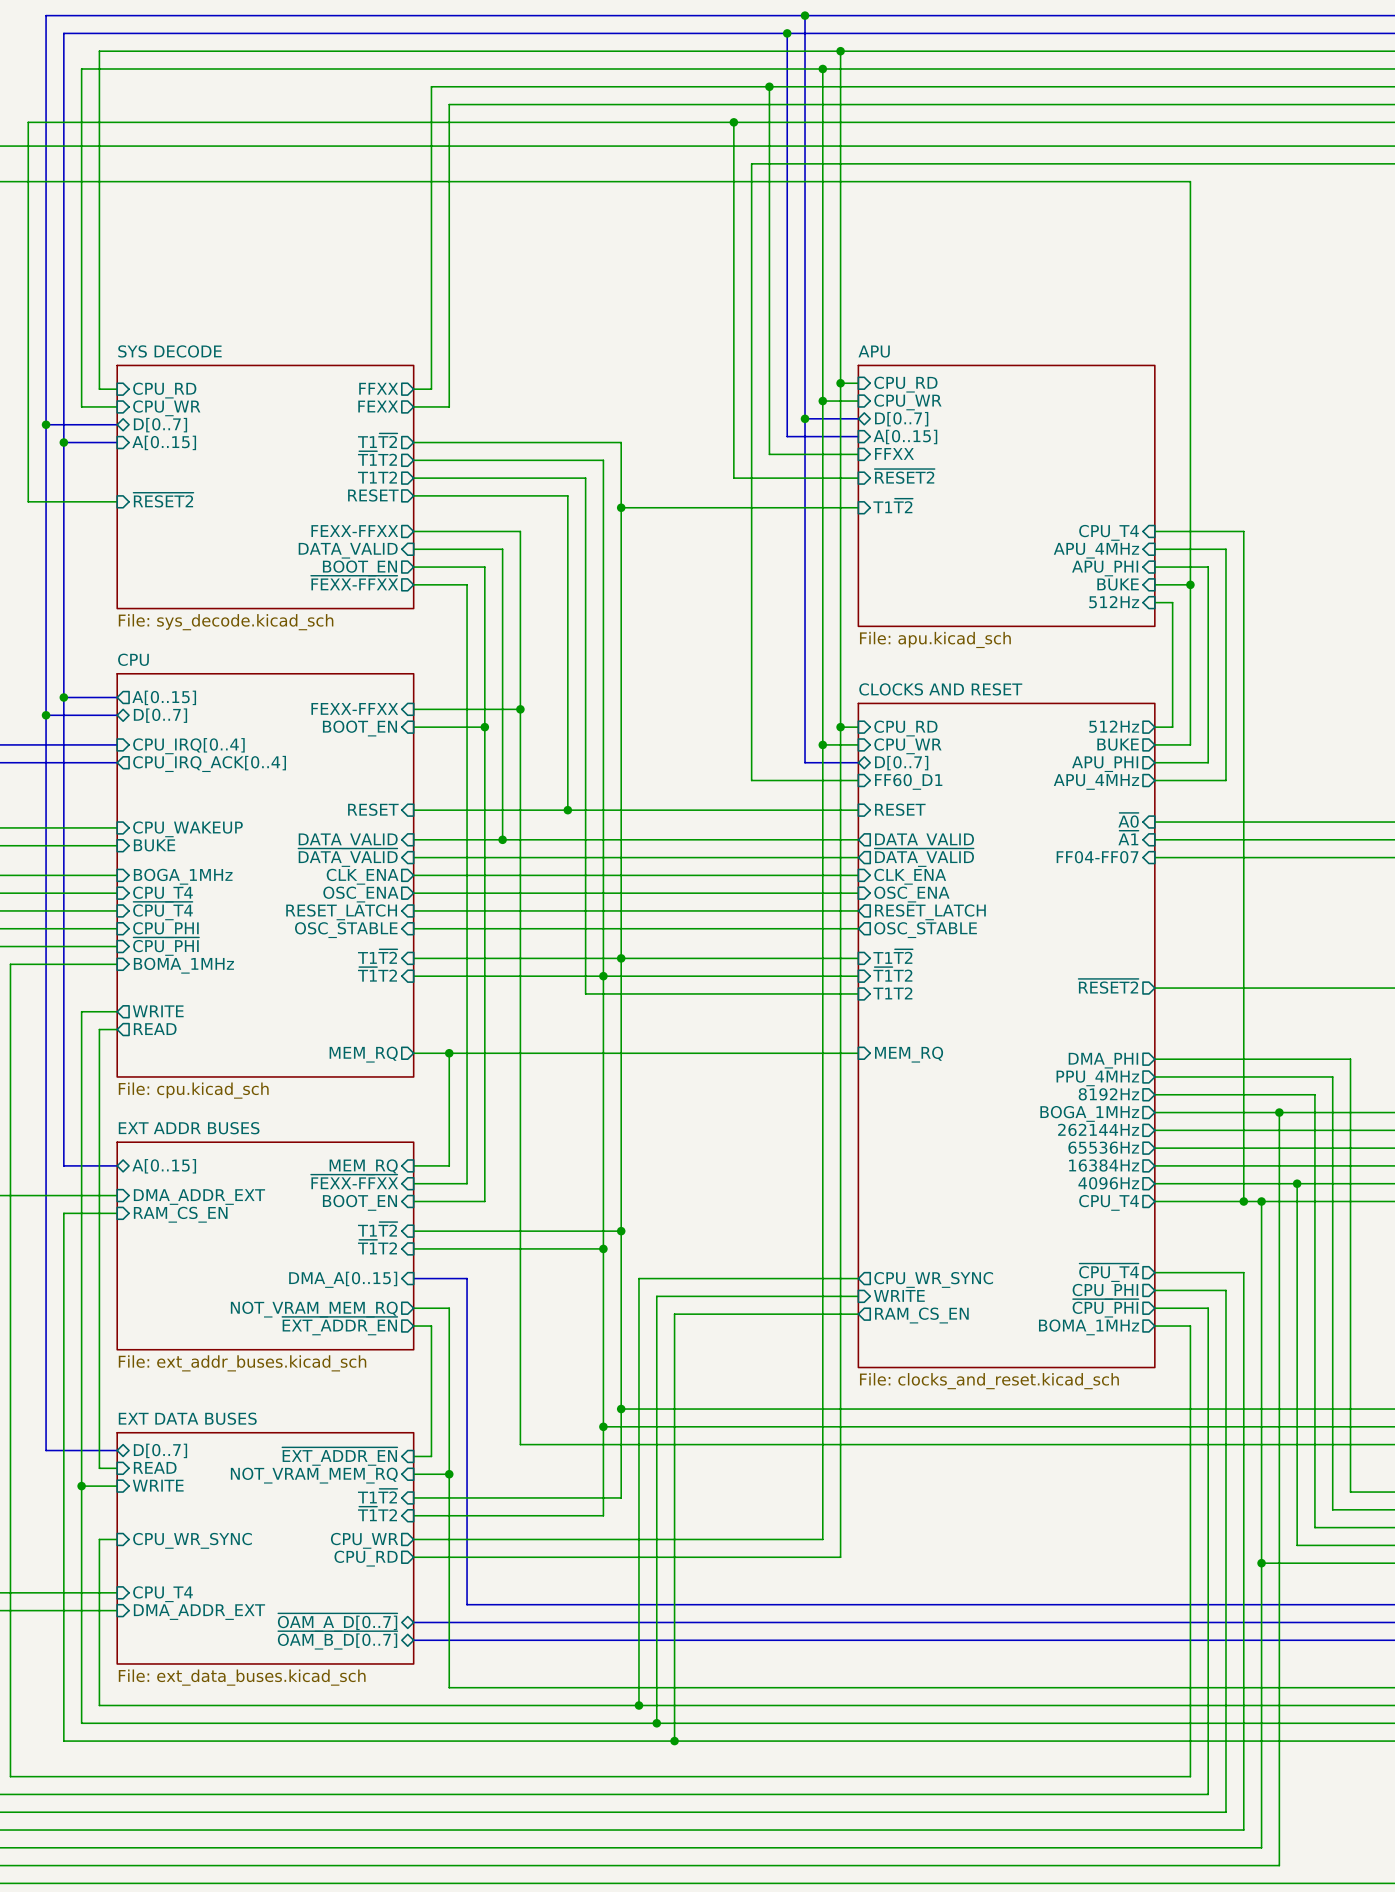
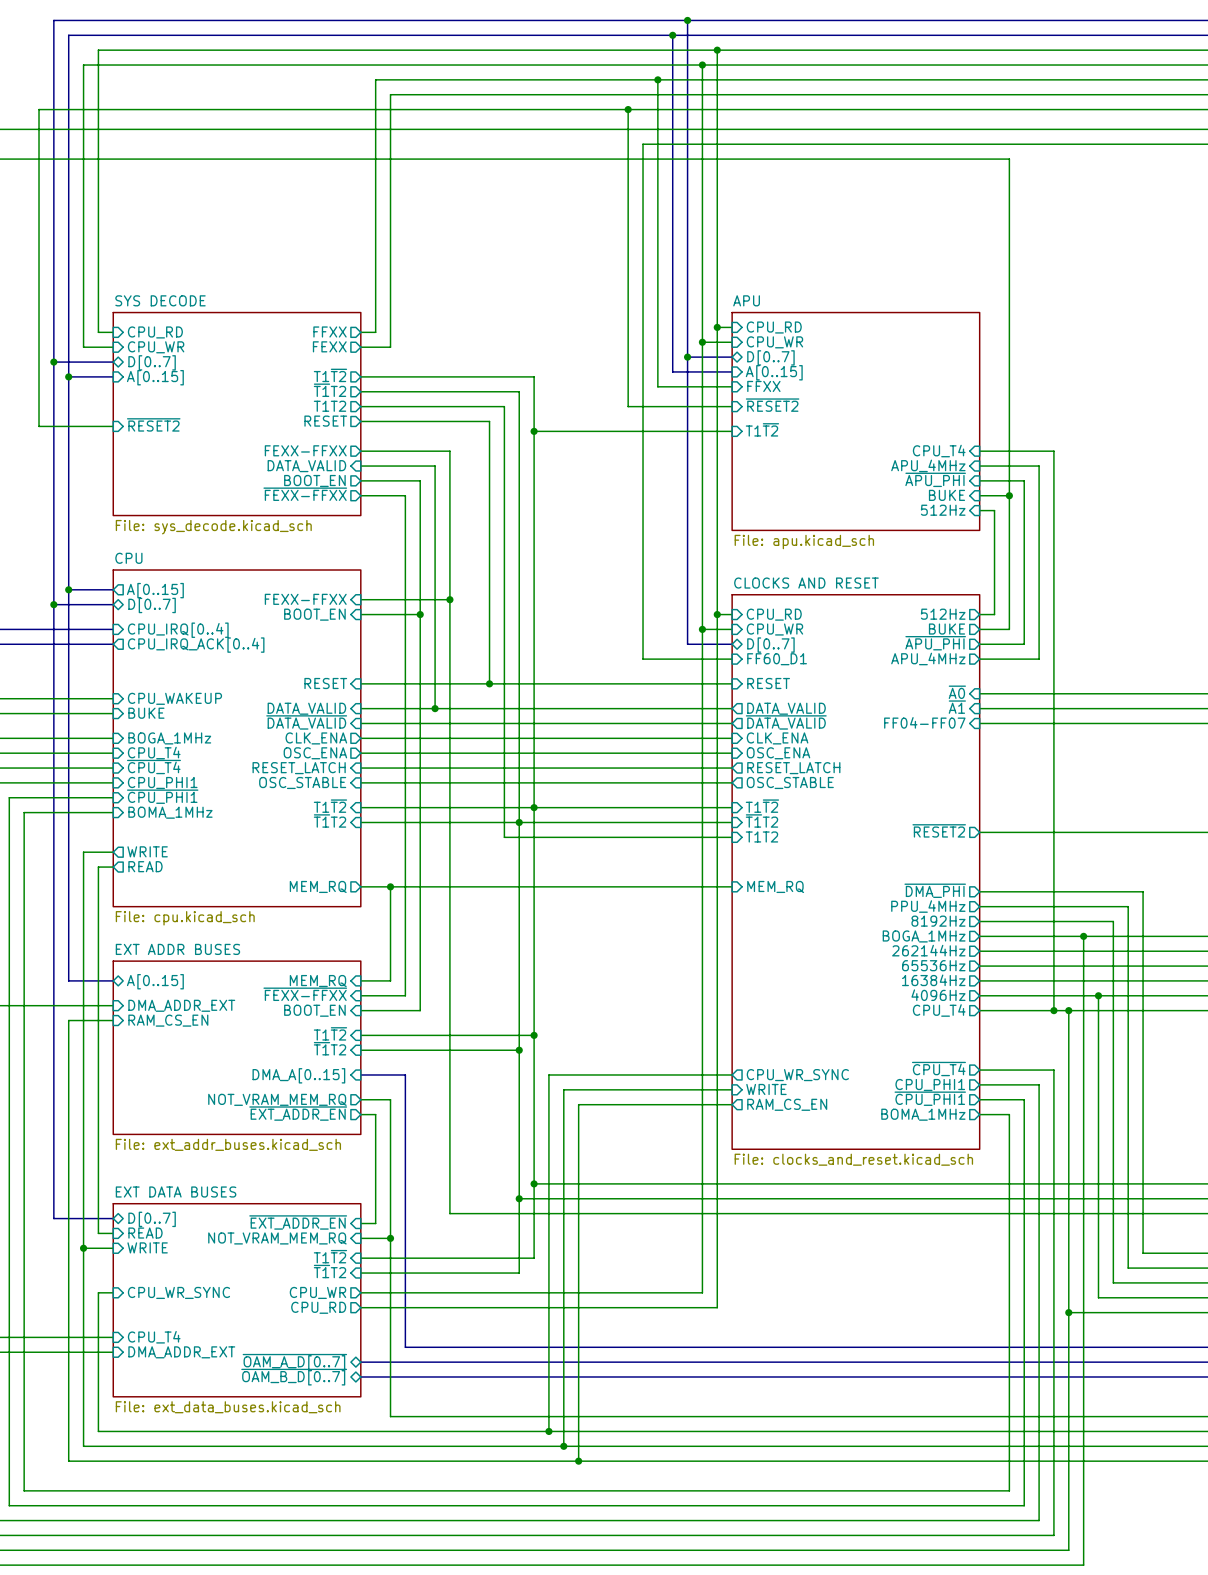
sheet pin: APU_PHI (1105, 568) -> ~{APU_PHI} (935, 479)
sheet pin: APU_PHI (1105, 764) -> ~{APU_PHI} (935, 643)
sheet pin: CPU_PHI (165, 930) -> CPU_PHI1 (162, 782)
sheet pin: ~{CPU_PHI} (166, 946) -> ~{CPU_PHI1} (162, 796)
sheet pin: DMA_PHI (1103, 1060) -> ~{DMA_PHI} (935, 890)
sheet pin: CPU_PHI (1105, 1291) -> CPU_PHI1 (930, 1084)
sheet pin: ~{CPU_PHI} (1105, 1308) -> ~{CPU_PHI1} (930, 1098)

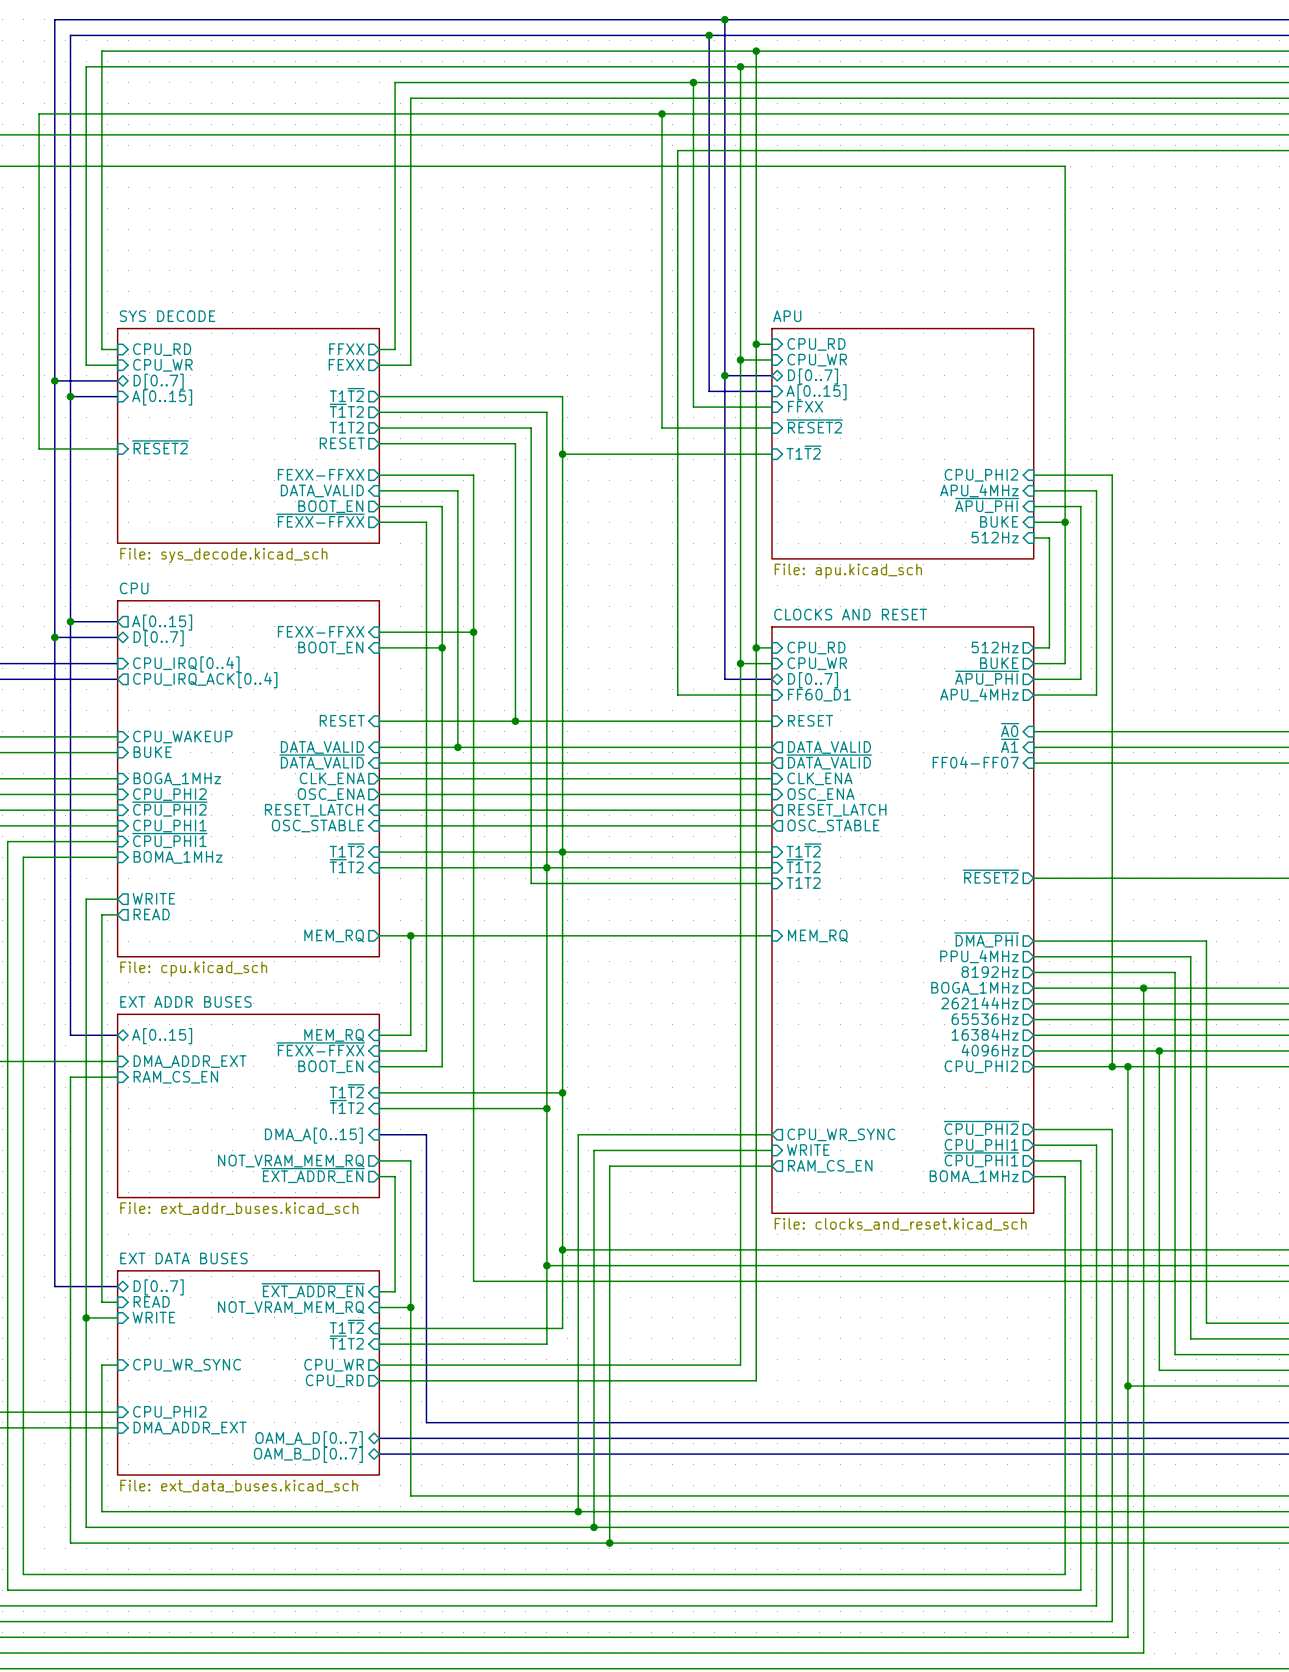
sheet pin: CPU_T4 (939, 451) -> CPU_PHI2 (981, 475)
sheet pin: CPU_T4 (154, 753) -> CPU_PHI2 (169, 794)
sheet pin: ~{CPU_T4} (153, 767) -> ~{CPU_PHI2} (169, 809)
sheet pin: CPU_T4 (939, 1010) -> CPU_PHI2 (981, 1066)
sheet pin: ~{CPU_T4} (938, 1069) -> ~{CPU_PHI2} (981, 1128)
sheet pin: CPU_T4 (154, 1337) -> CPU_PHI2 (169, 1412)
sheet pin: ~{OAM_A_D[0..7]} (294, 1362) -> OAM_A_D[0..7] (309, 1439)
sheet pin: ~{OAM_B_D[0..7]} (294, 1377) -> OAM_B_D[0..7] (308, 1454)

